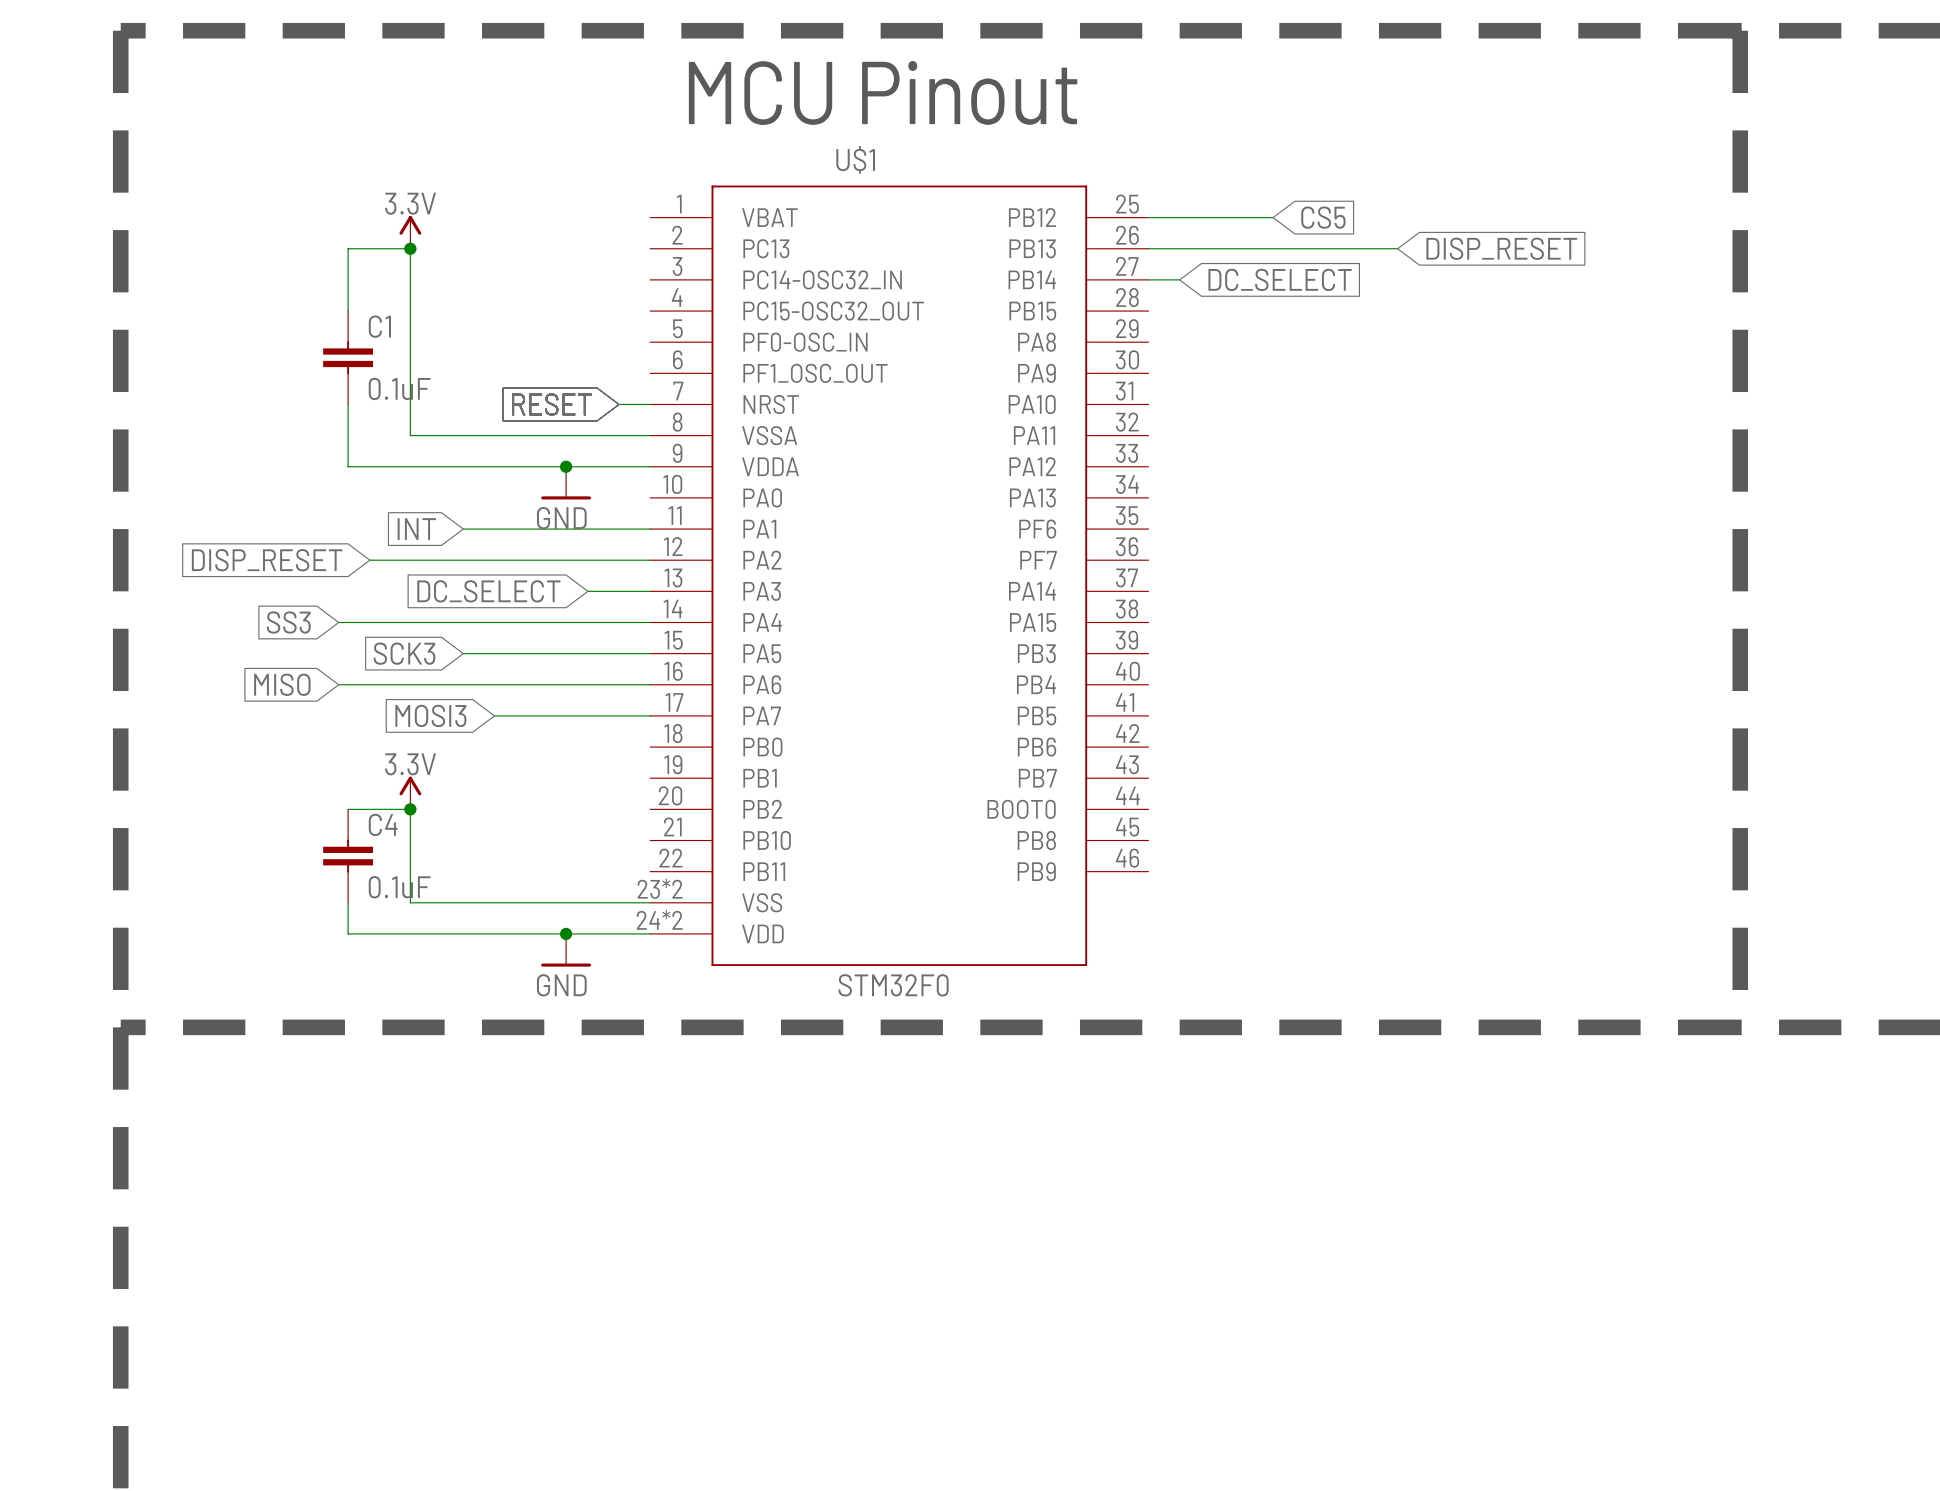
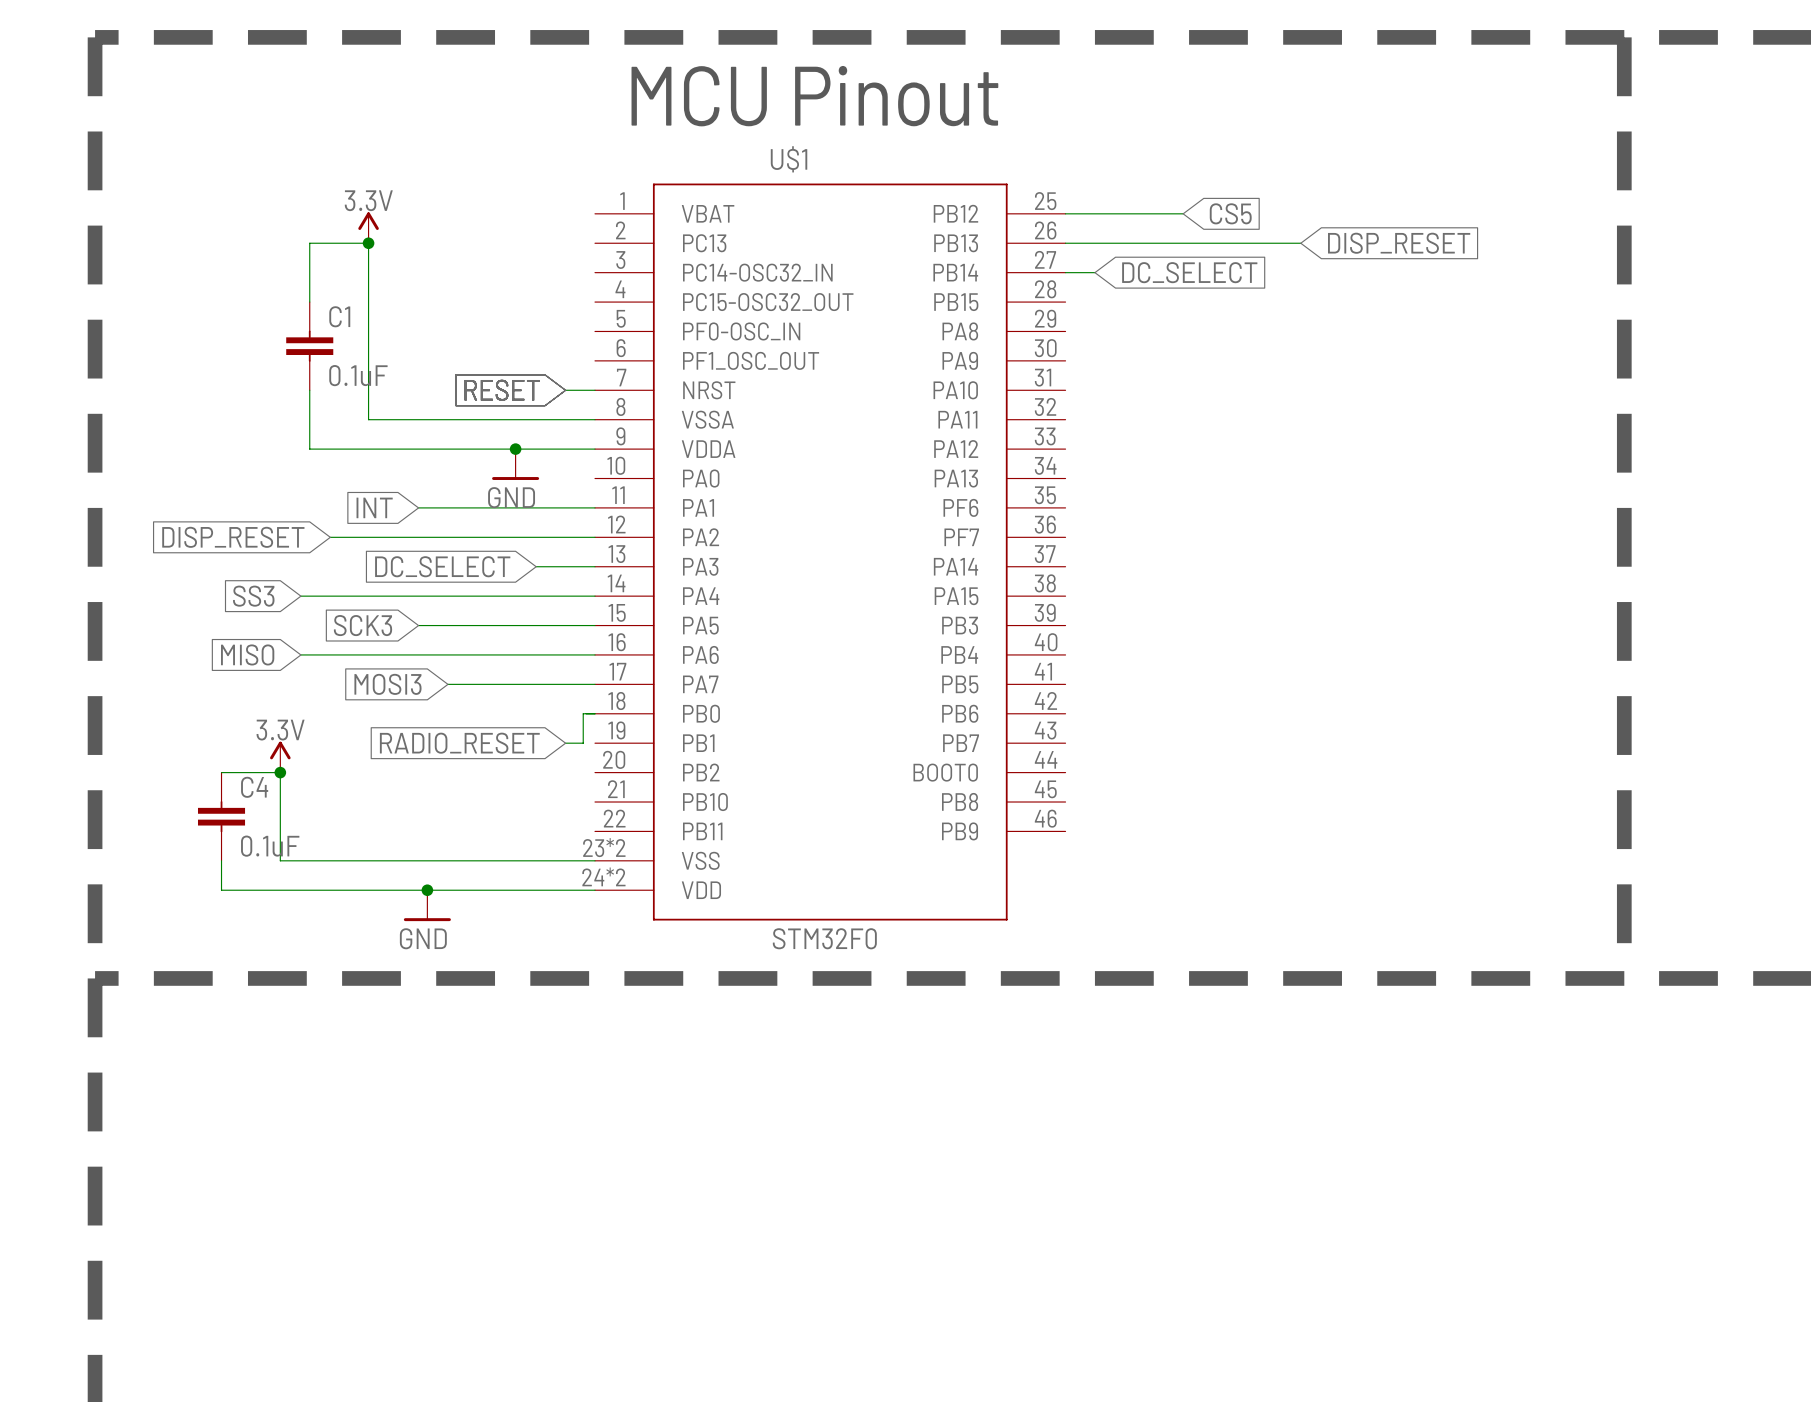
wire: none -> (595, 713) (583, 713) (583, 743) (565, 743)
global label: none -> RADIO_RESET (459, 743)
power symbol position: 3.3V (410, 793) -> 3.3V (280, 757)
junction: none -> (280, 772)
wire: (348, 809) (410, 809) (410, 902) -> (221, 772) (280, 772) (280, 860) (368, 860)
junction: (410, 809) -> none
C4 position: (348, 856) -> (221, 816)
wire: (348, 902) (348, 933) -> (221, 860) (221, 890) (309, 890)
junction: none -> (427, 890)
junction: (566, 933) -> none
power symbol position: GND (566, 950) -> GND (427, 905)

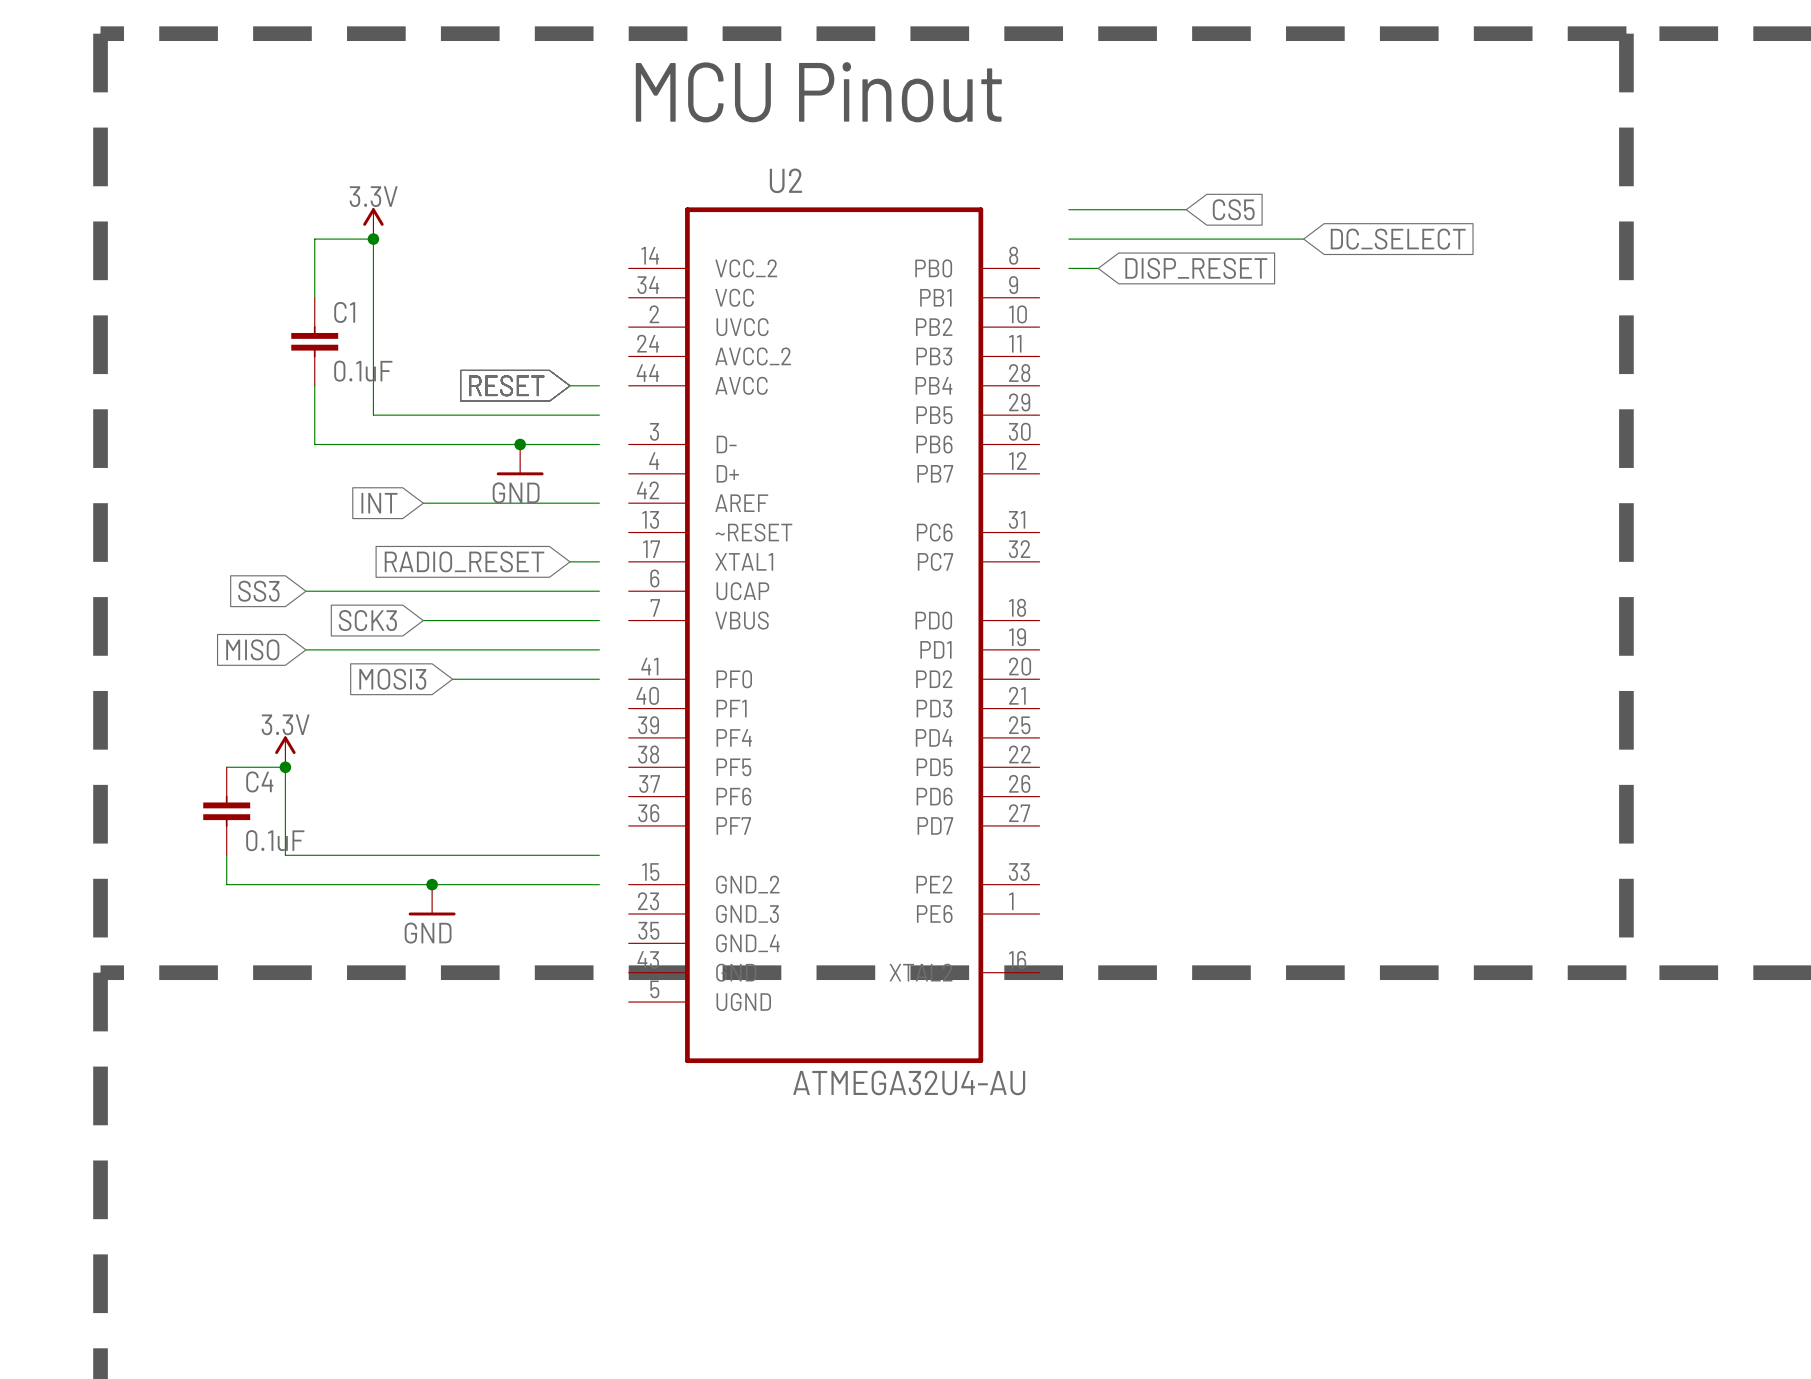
global label: DISP_RESET (1399, 243) -> DC_SELECT (1398, 239)
global label: DC_SELECT (1189, 272) -> DISP_RESET (1196, 268)
global label: DISP_RESET (233, 537) -> none
wire: (330, 537) (595, 537) -> none
U$1: STM32F0 (830, 552) -> none
global label: DC_SELECT (442, 566) -> none
wire: (536, 566) (565, 566) -> none
U2: none -> ATMEGA32U4-AU (834, 635)
wire: (595, 713) (583, 713) (583, 743) (565, 743) -> none
global label position: RADIO_RESET (459, 743) -> RADIO_RESET (464, 561)

